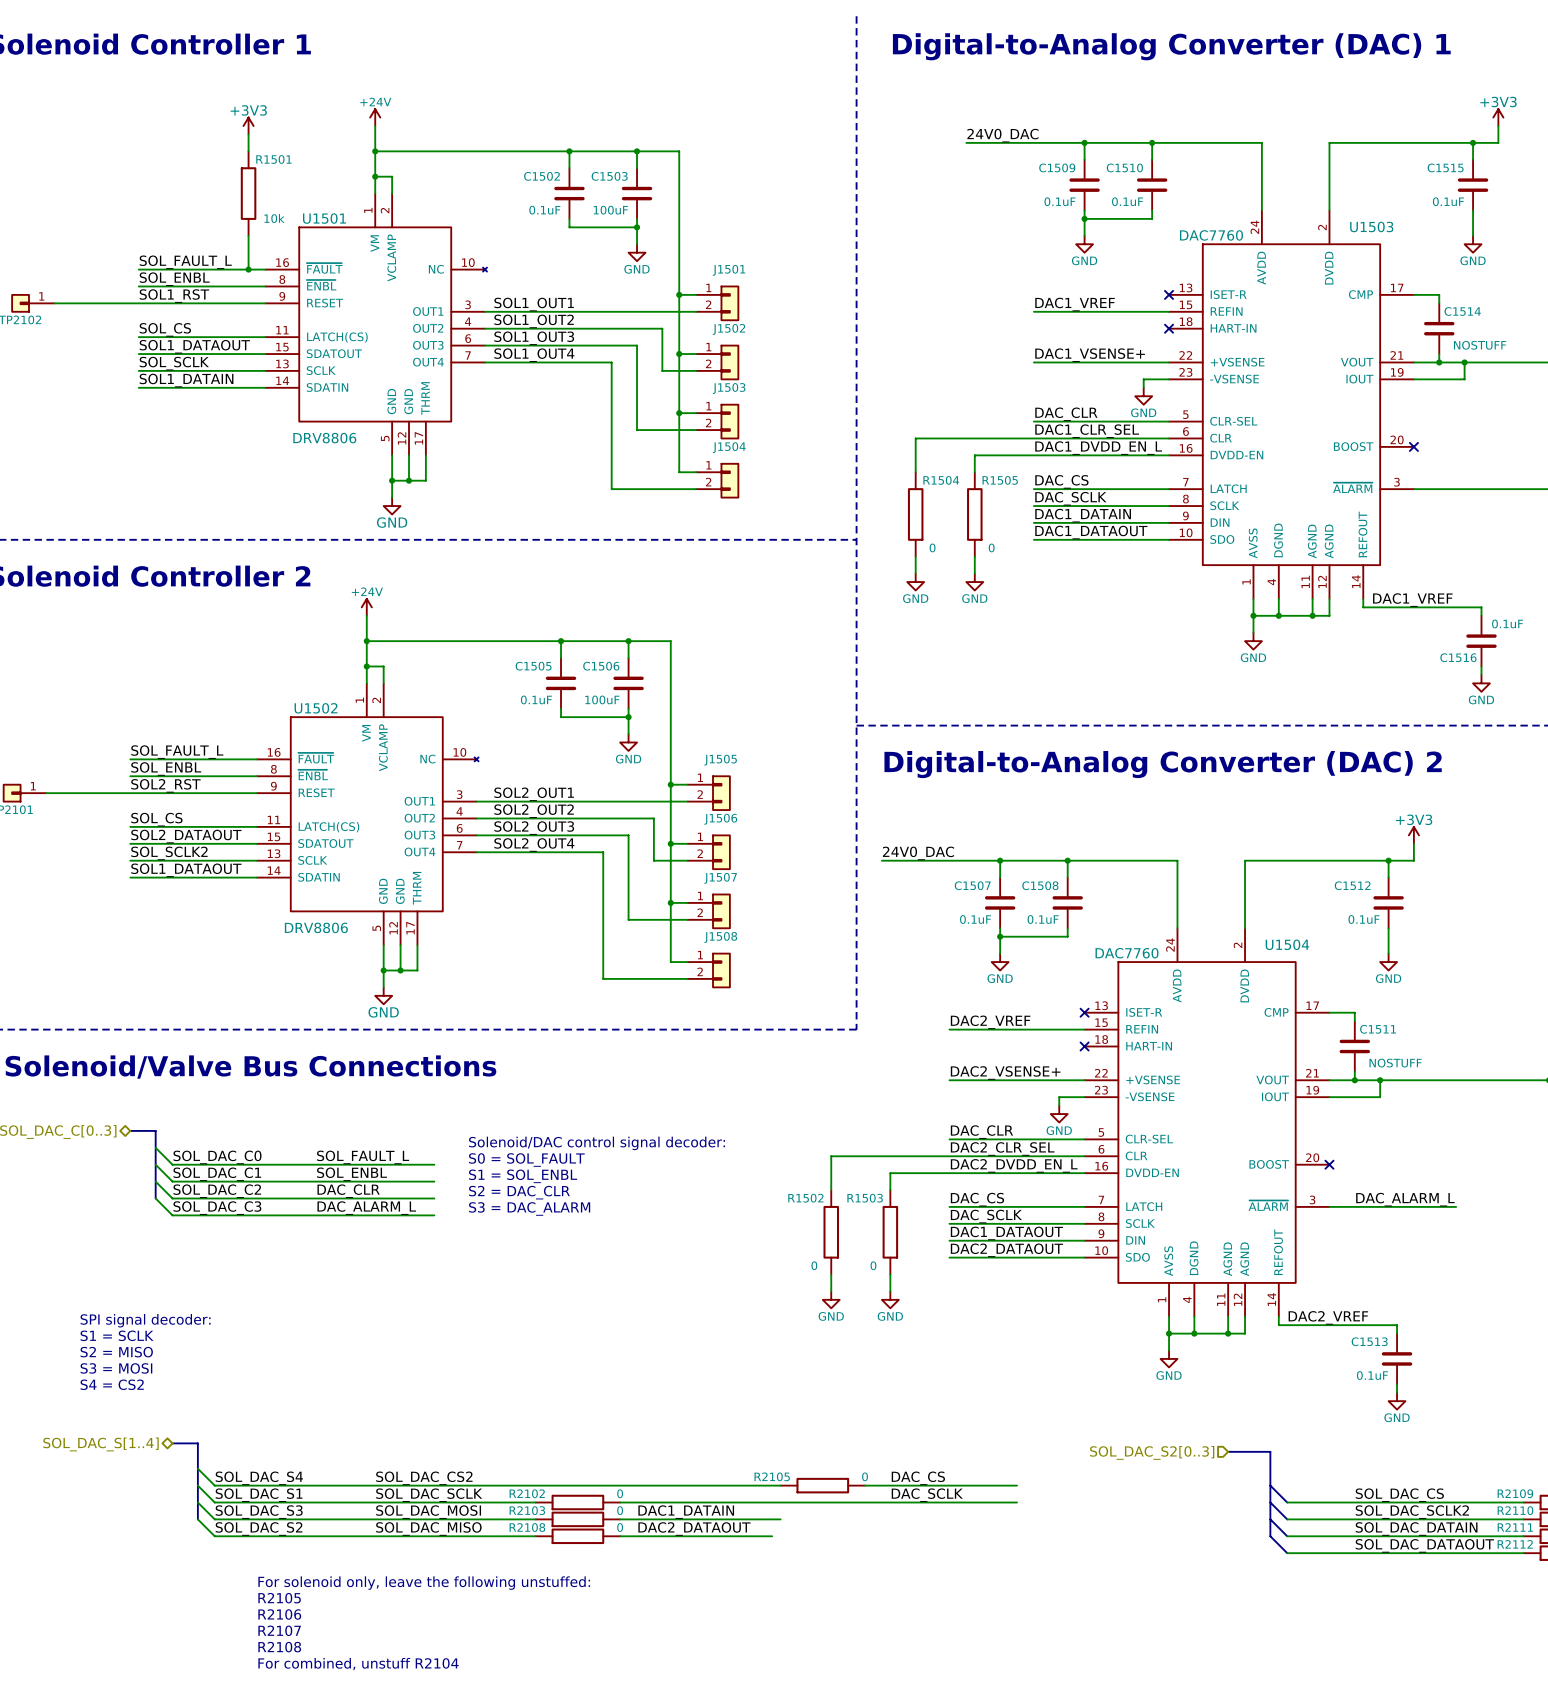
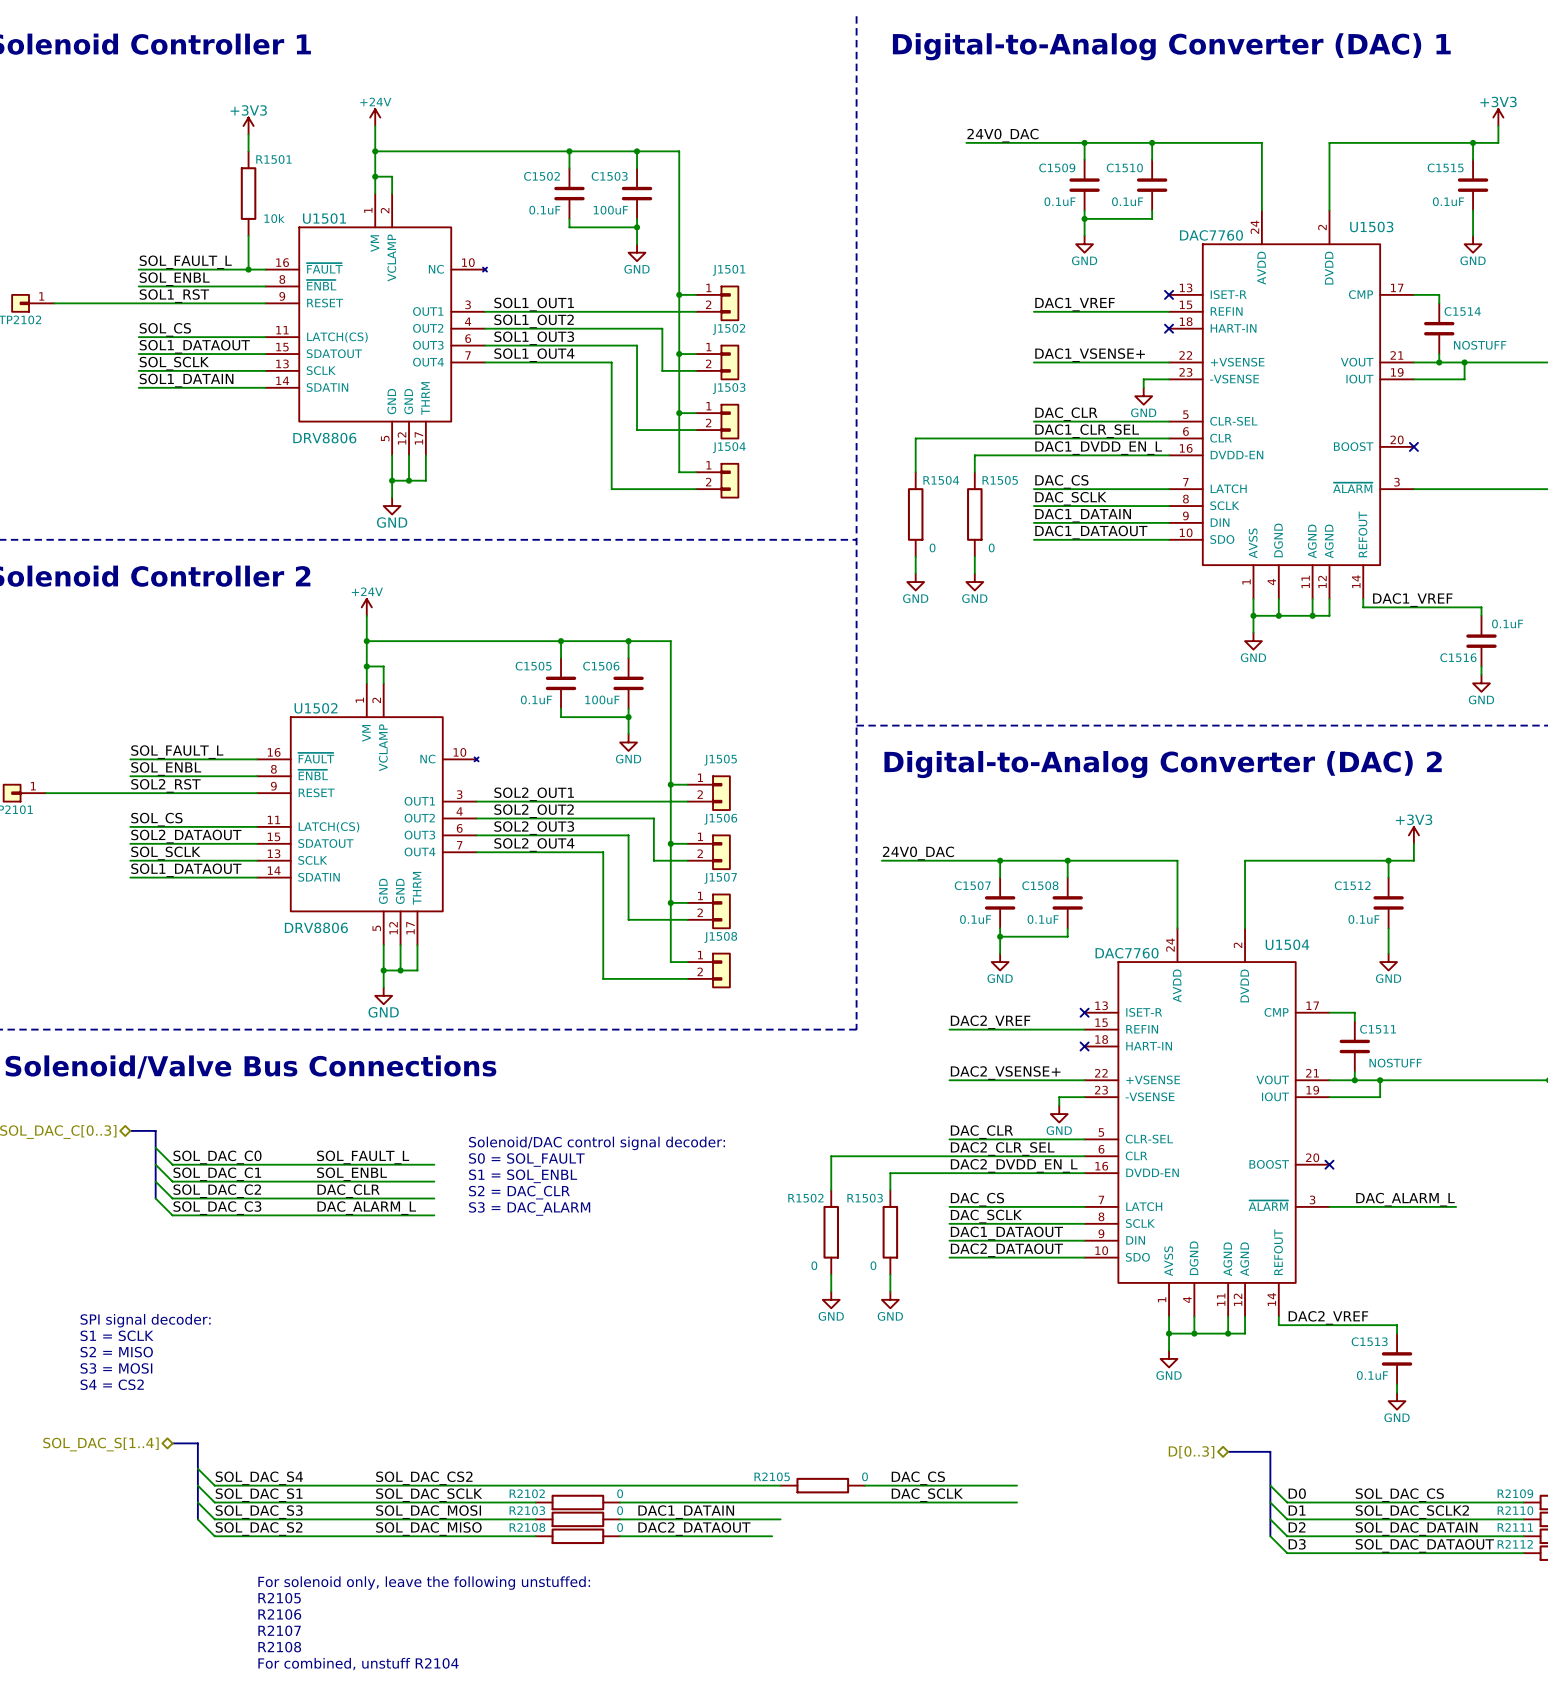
label: SOL_SCLK2 (169, 853) -> SOL_SCLK (165, 853)
hierarchical label shape: input (1152, 1452) -> bidirectional (1191, 1452)
hierarchical label: SOL_DAC_S2[0..3] (1152, 1452) -> D[0..3] (1191, 1452)
bus: (1270, 1485) (1287, 1502) -> none
label: none -> D0 (1297, 1493)
bus: (1270, 1502) (1287, 1519) -> none
label: none -> D1 (1297, 1510)
bus: (1270, 1519) (1287, 1536) -> none
label: none -> D2 (1297, 1527)
bus: (1270, 1536) (1287, 1553) -> none
label: none -> D3 (1297, 1544)

